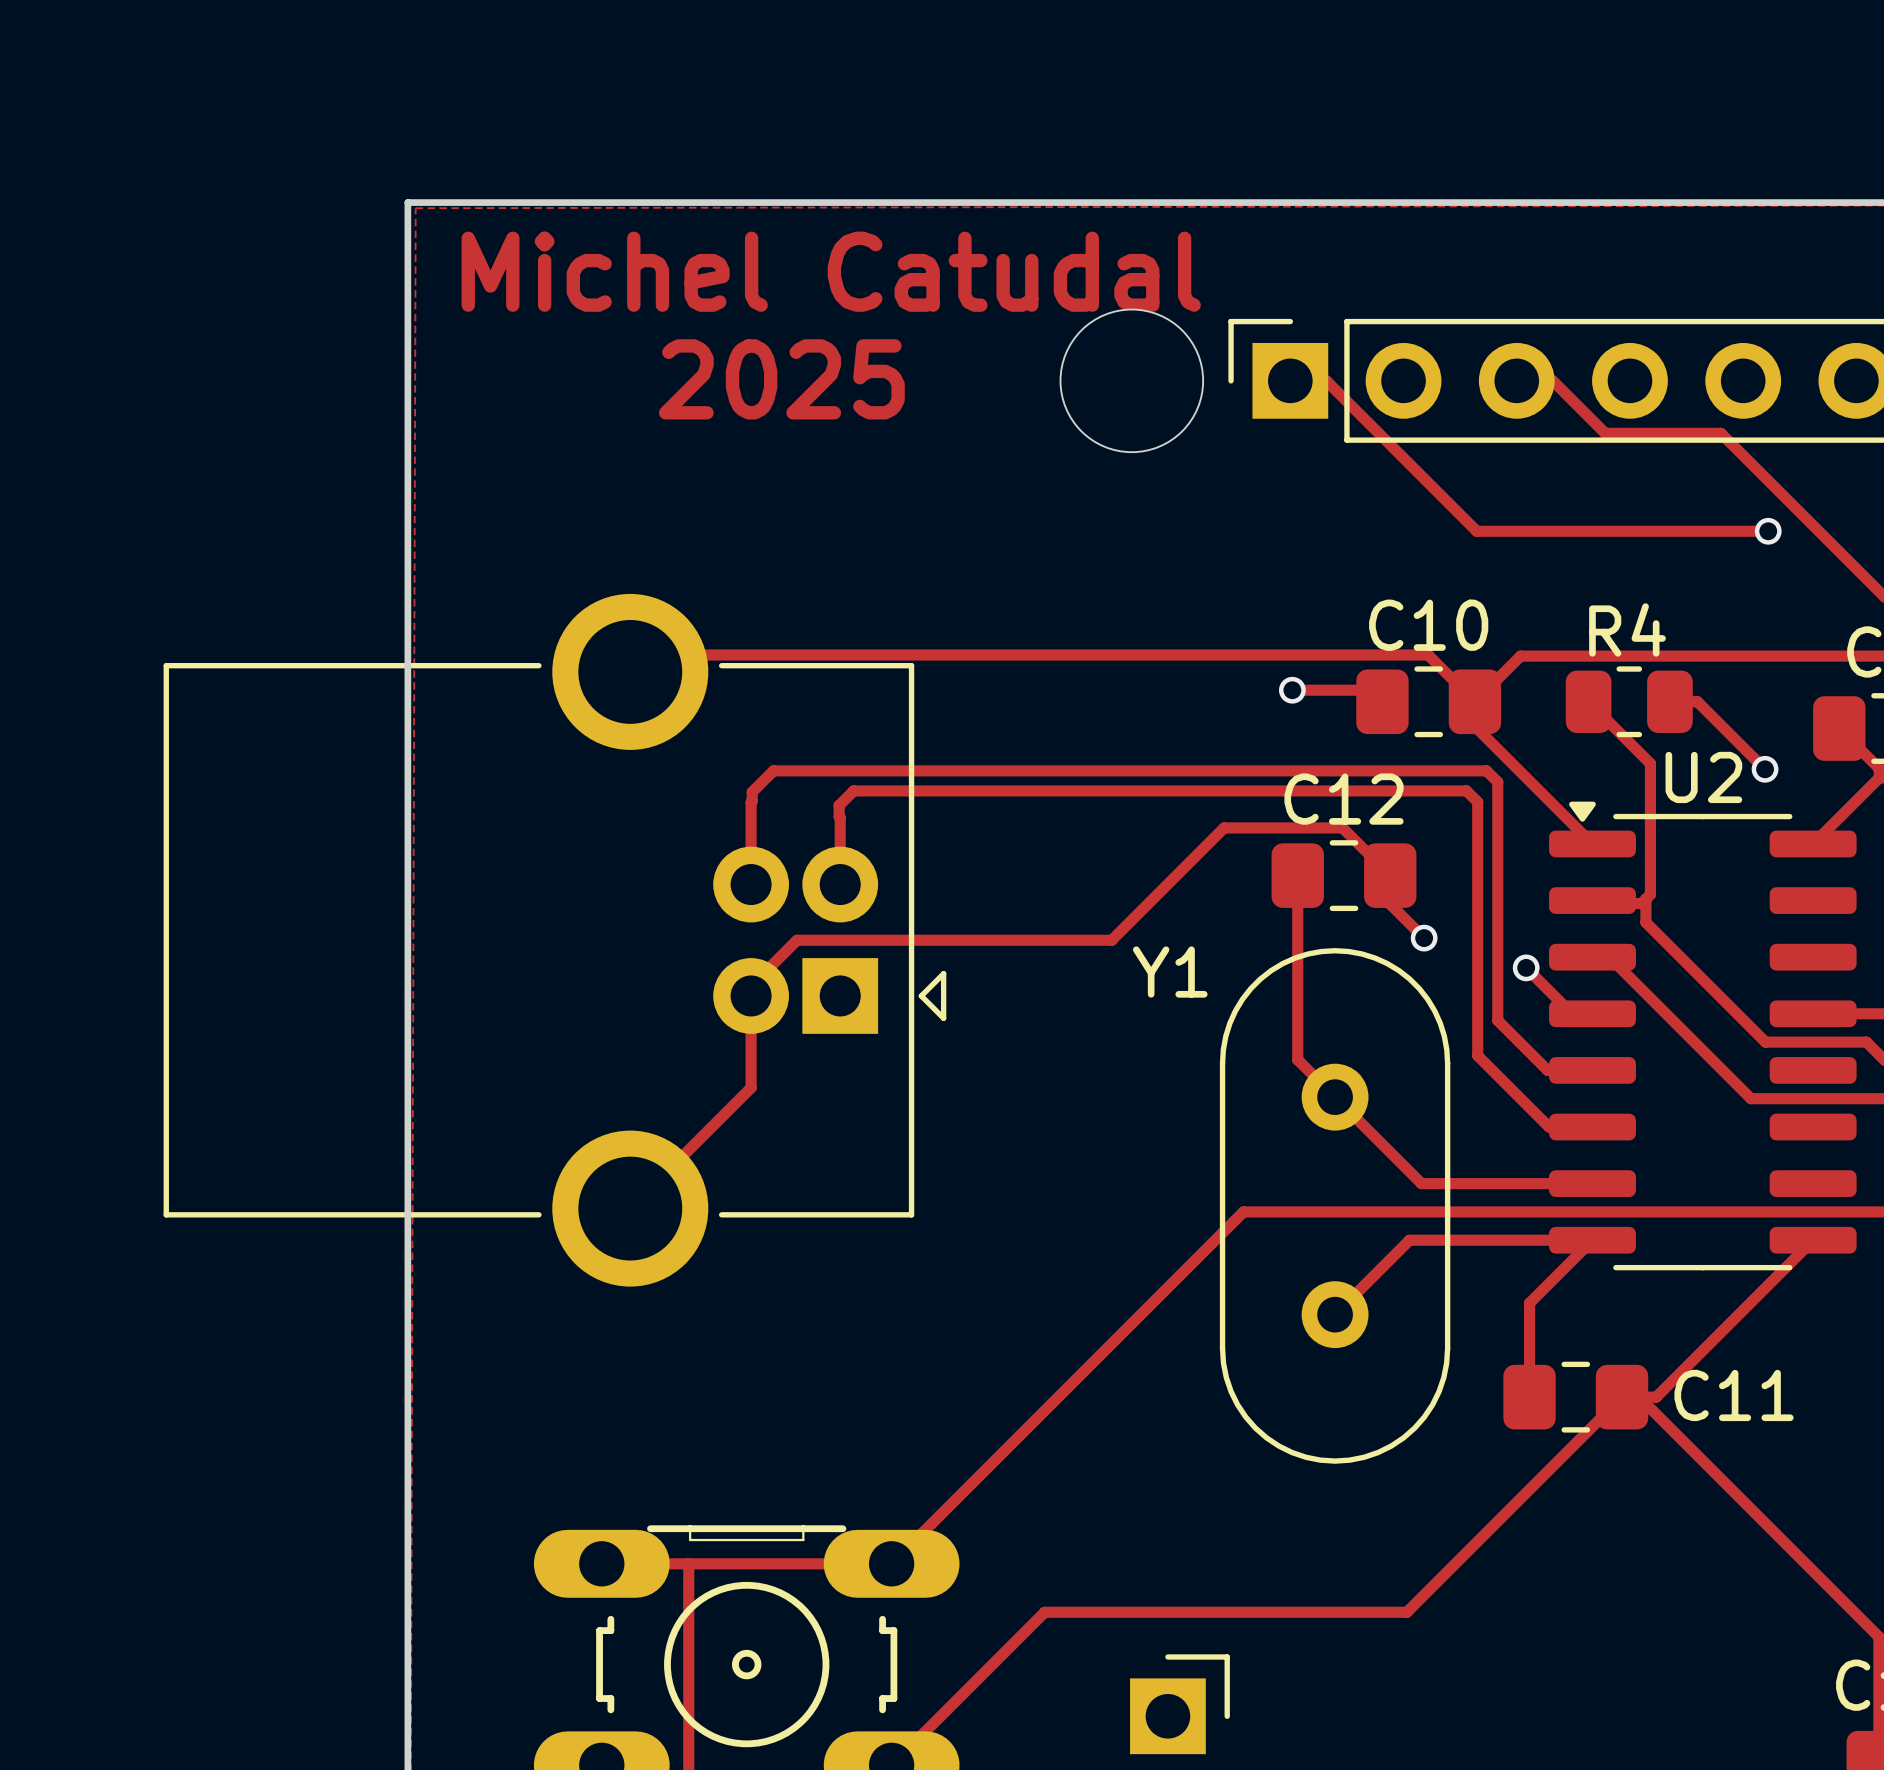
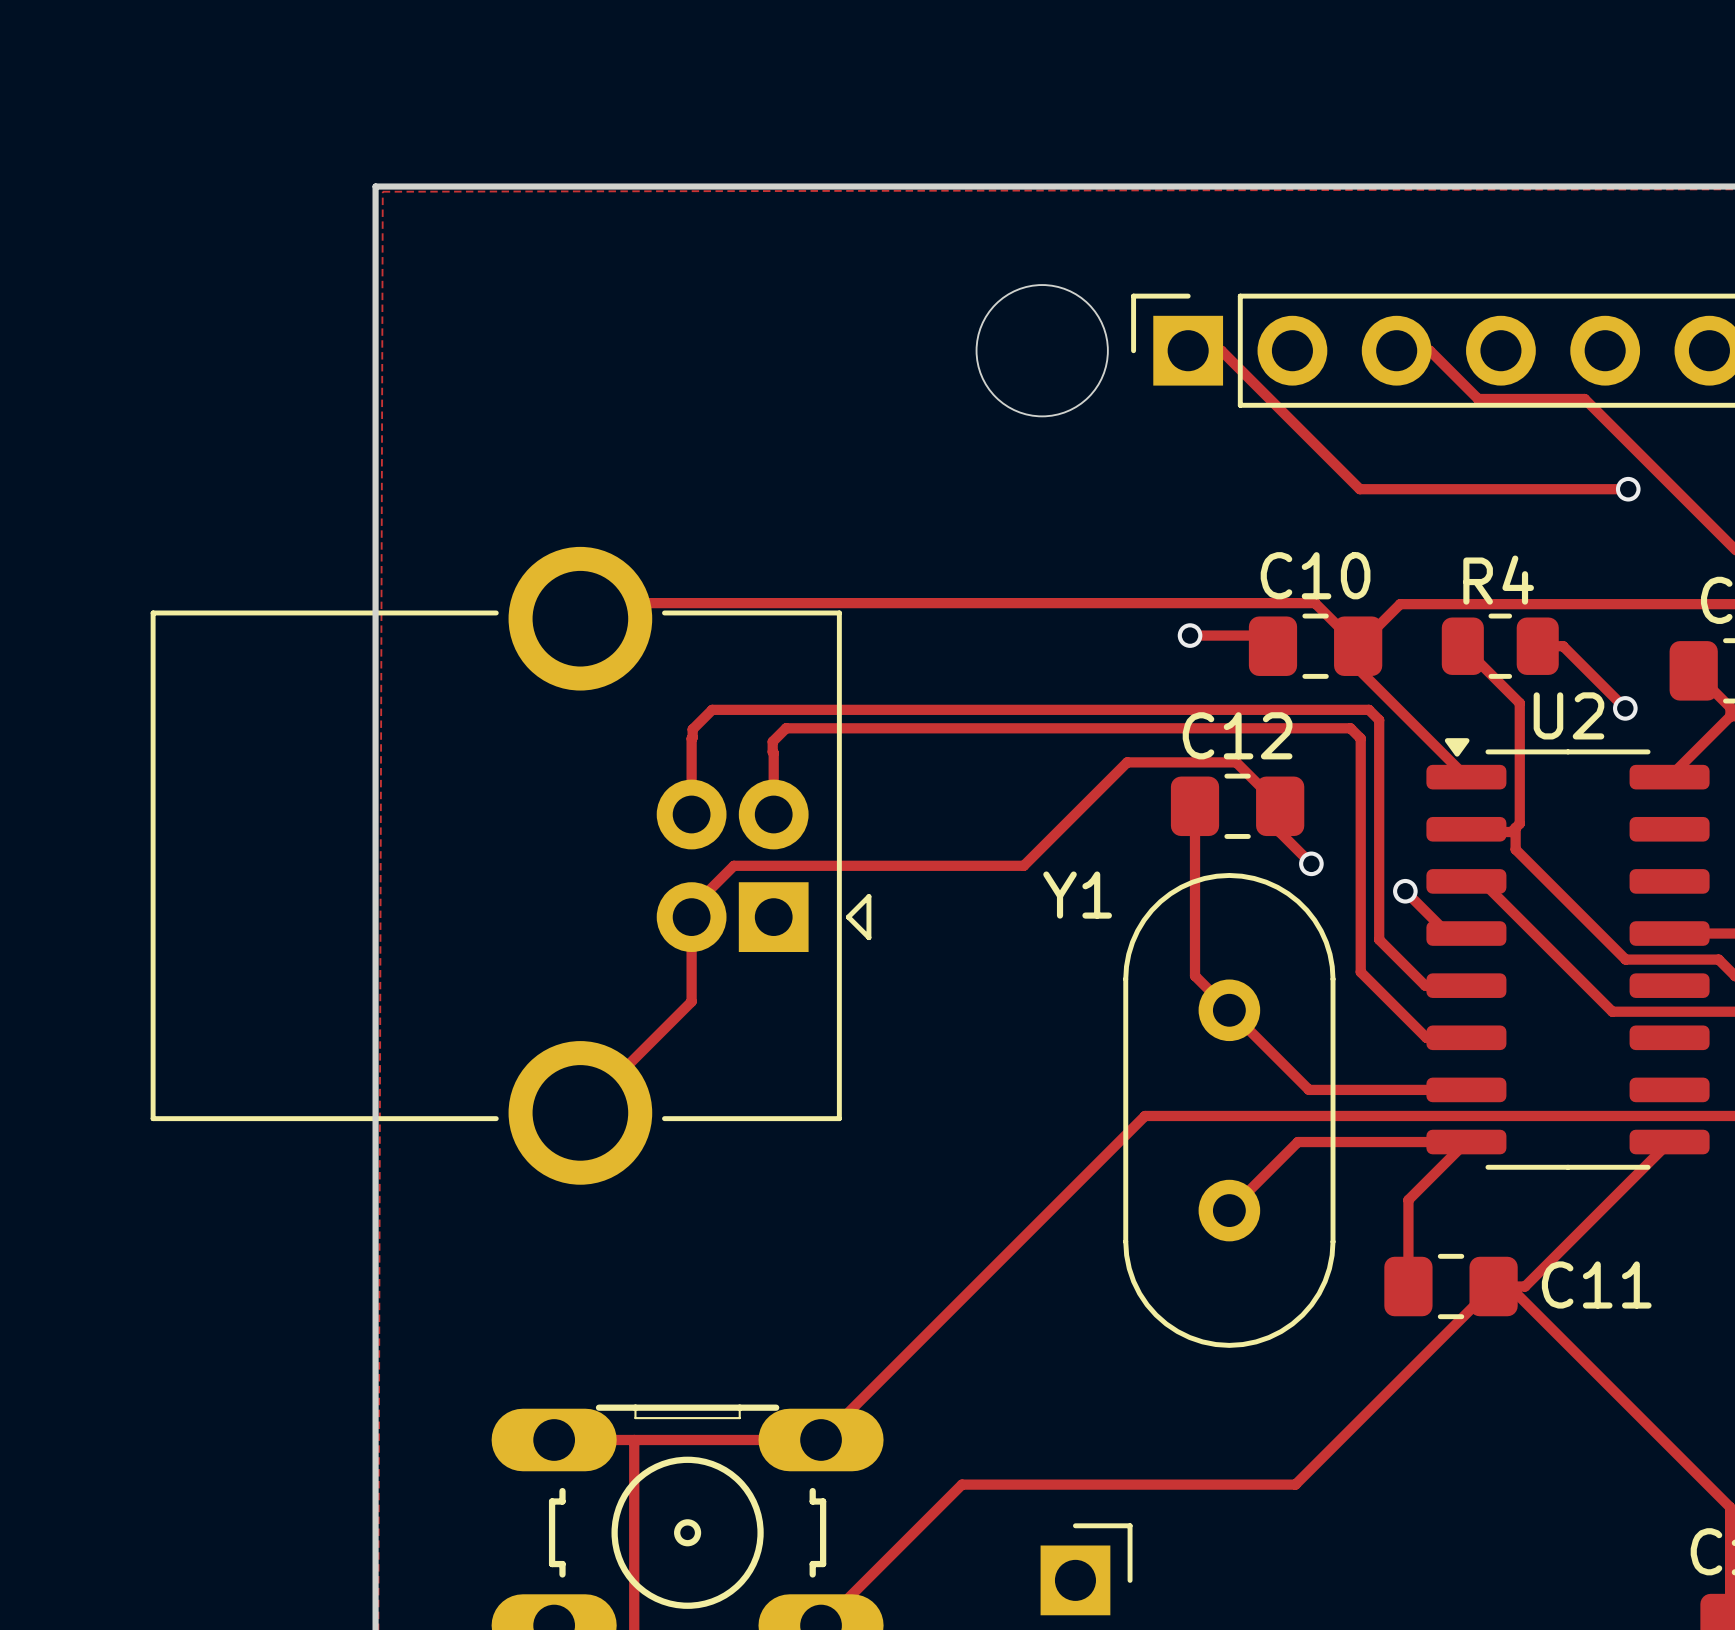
text: Michel Catudal (831, 271) -> none
text: 2025 (781, 379) -> none

